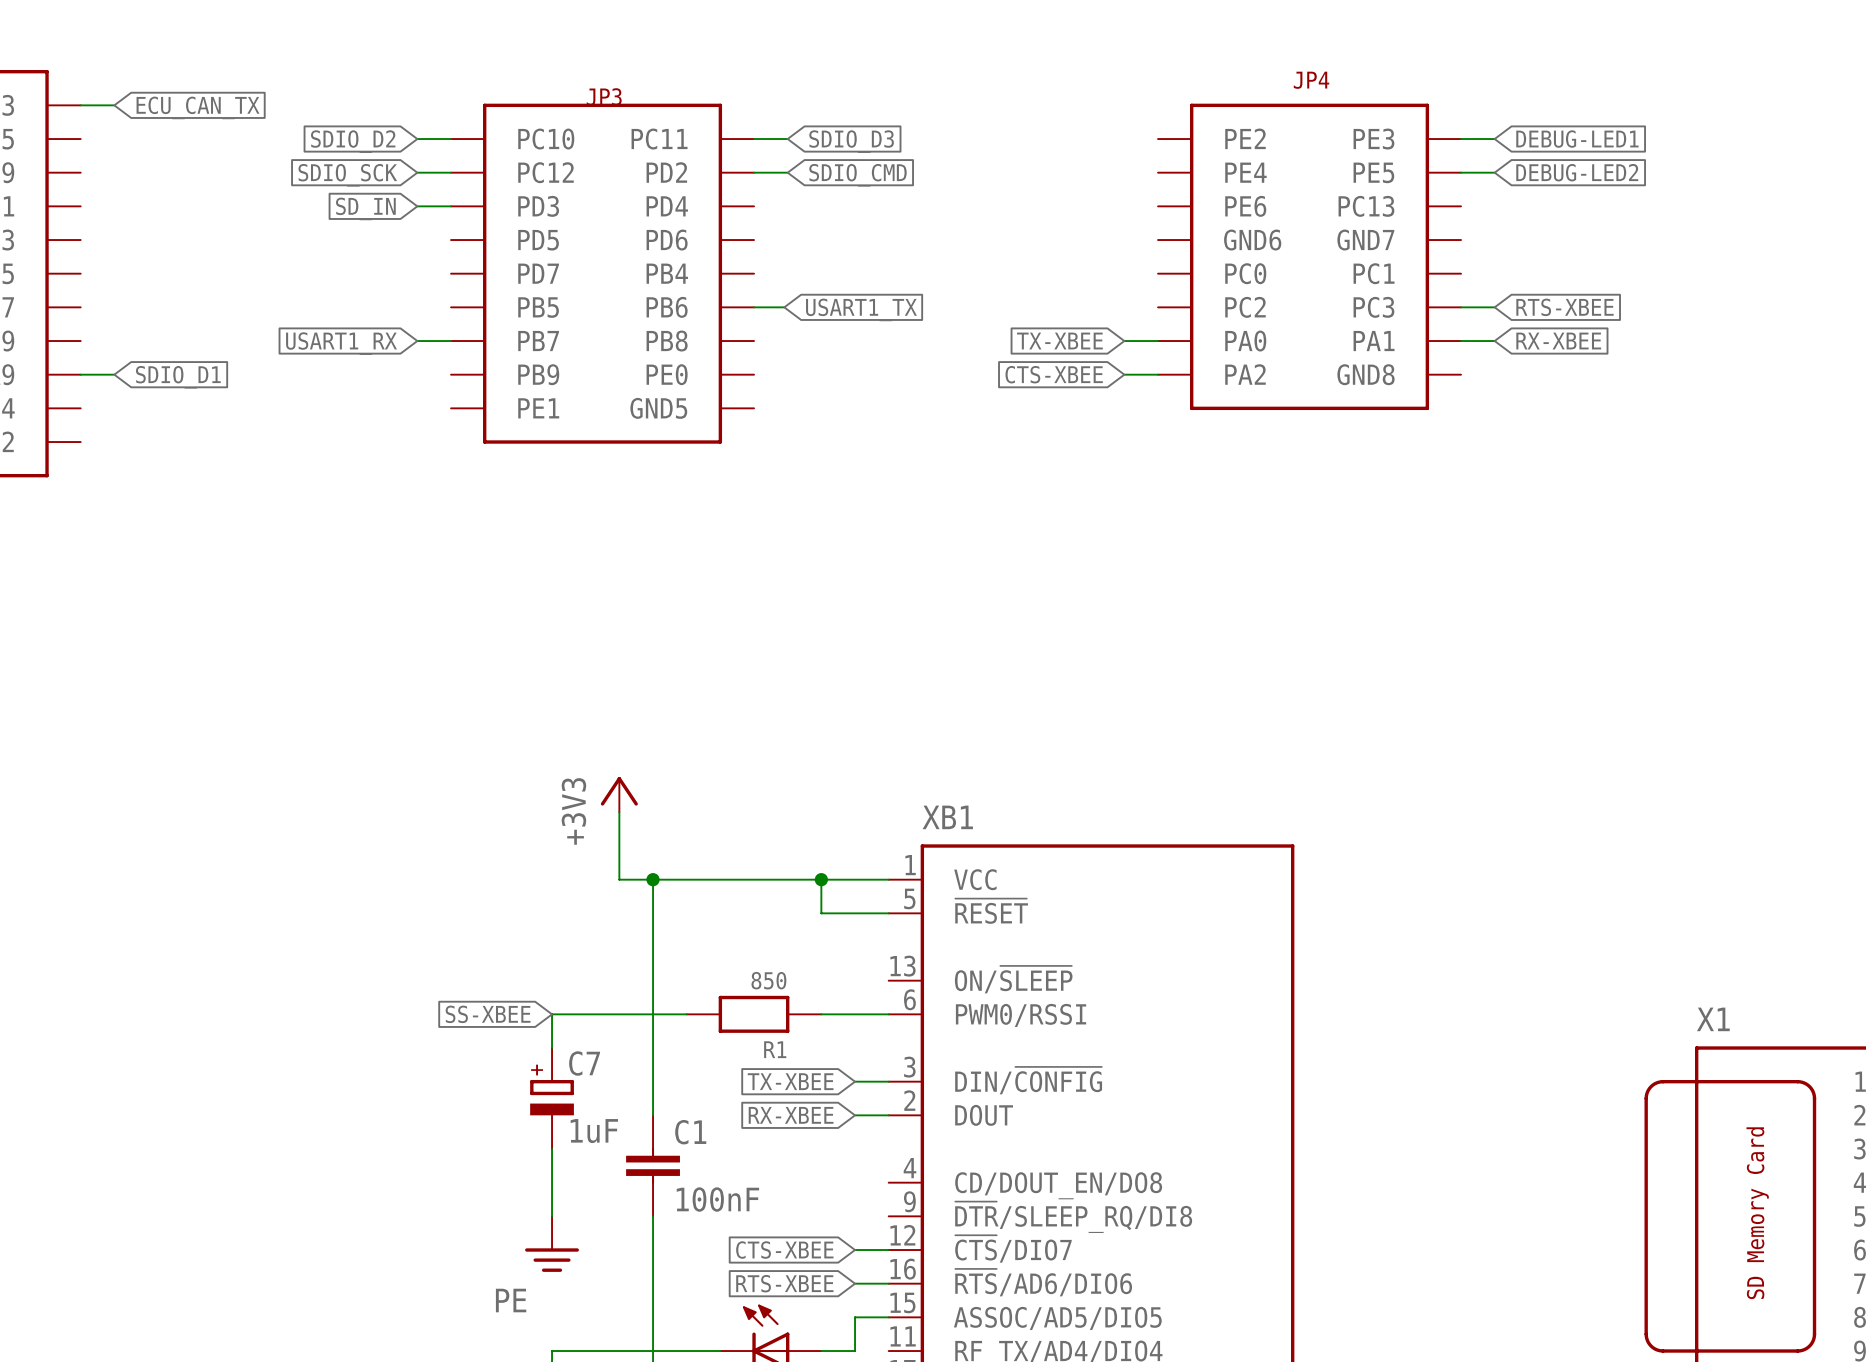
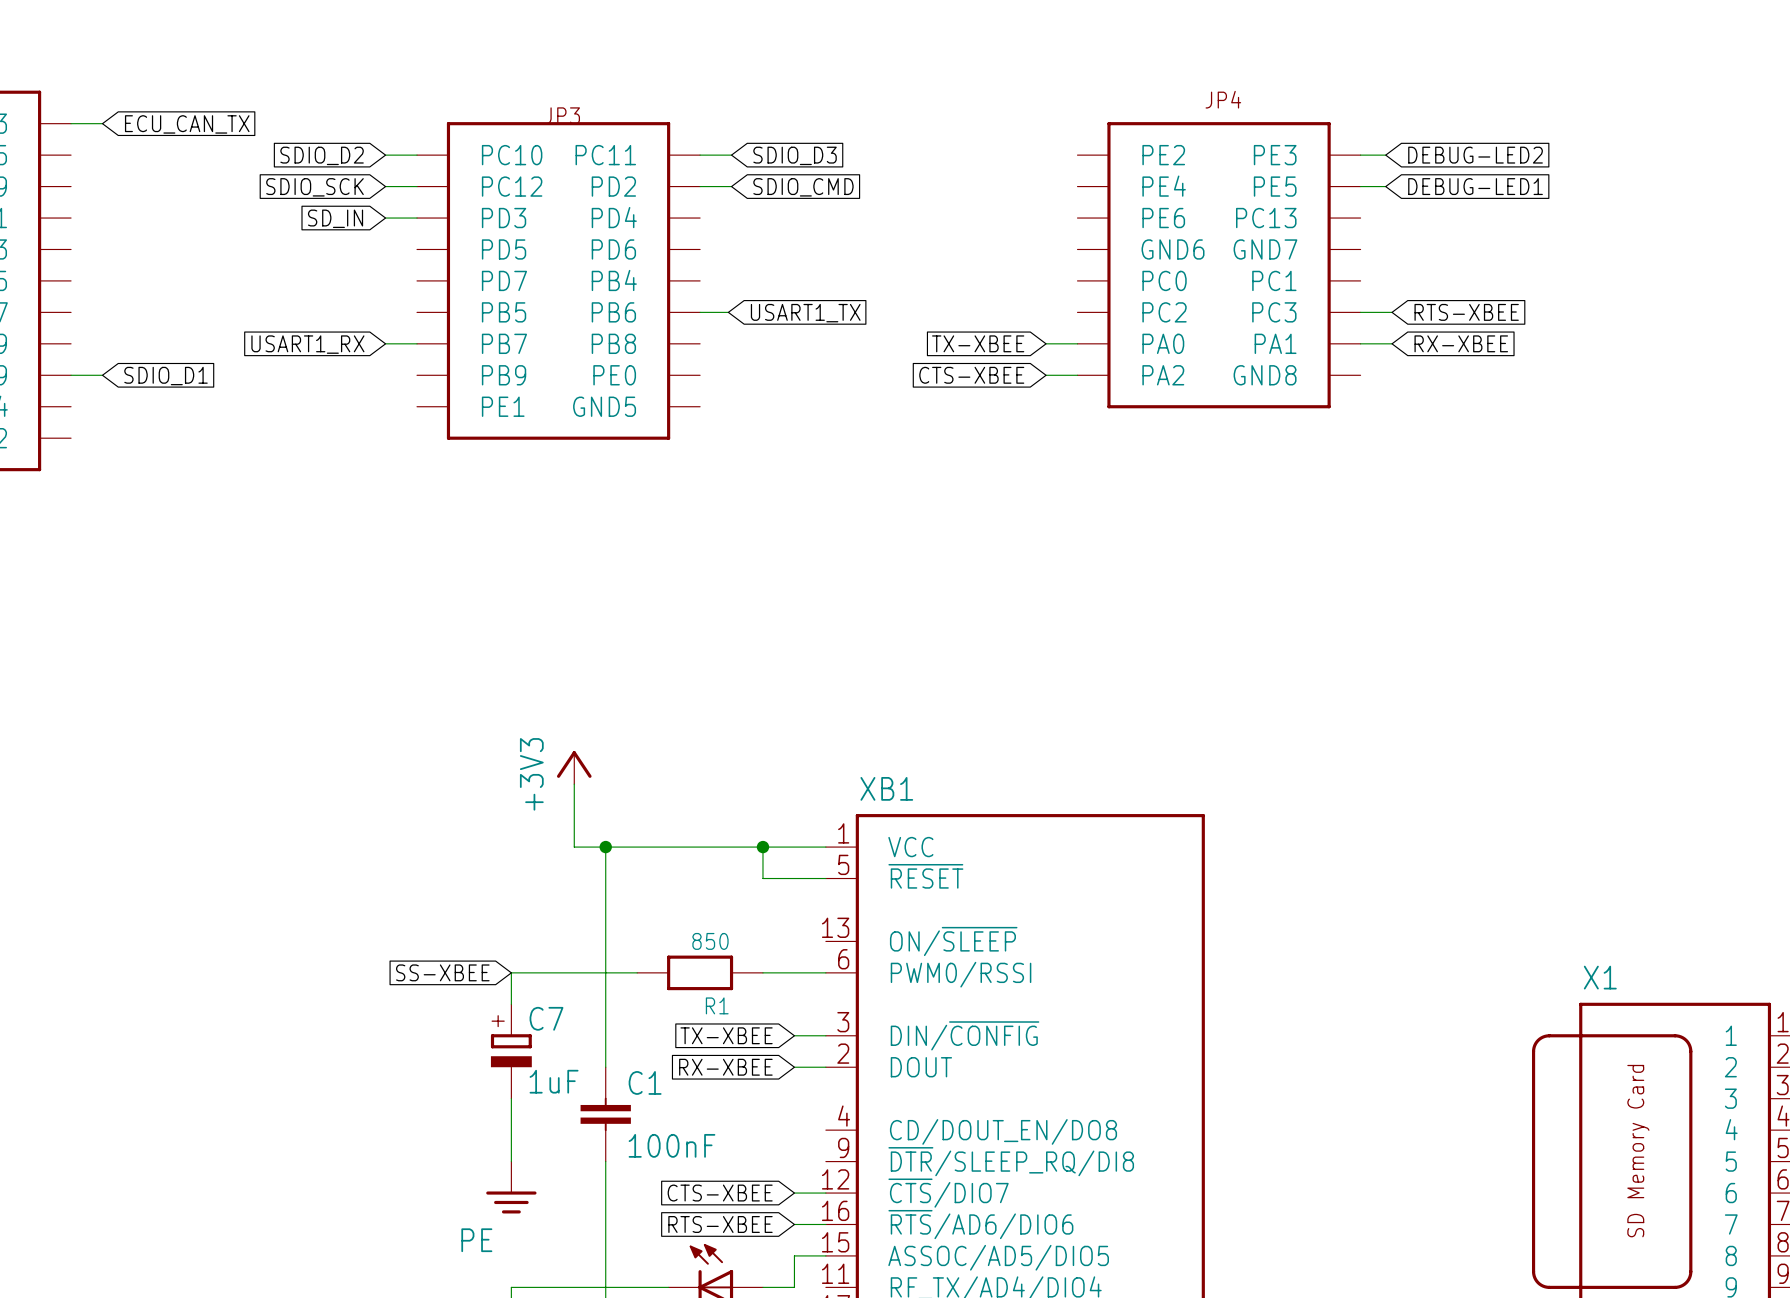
wire: (1487, 139) (1494, 139) -> none
global label: DEBUG-LED1 (1577, 139) -> DEBUG-LED2 (1475, 155)
wire: (1487, 172) (1494, 172) -> none
global label: DEBUG-LED2 (1577, 172) -> DEBUG-LED1 (1475, 186)

